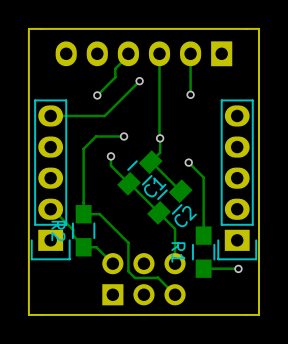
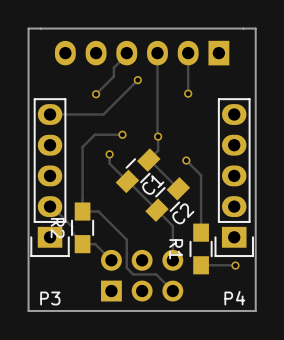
P3 name: none -> P3 (50, 298)
P4 name: none -> P4 (234, 298)

